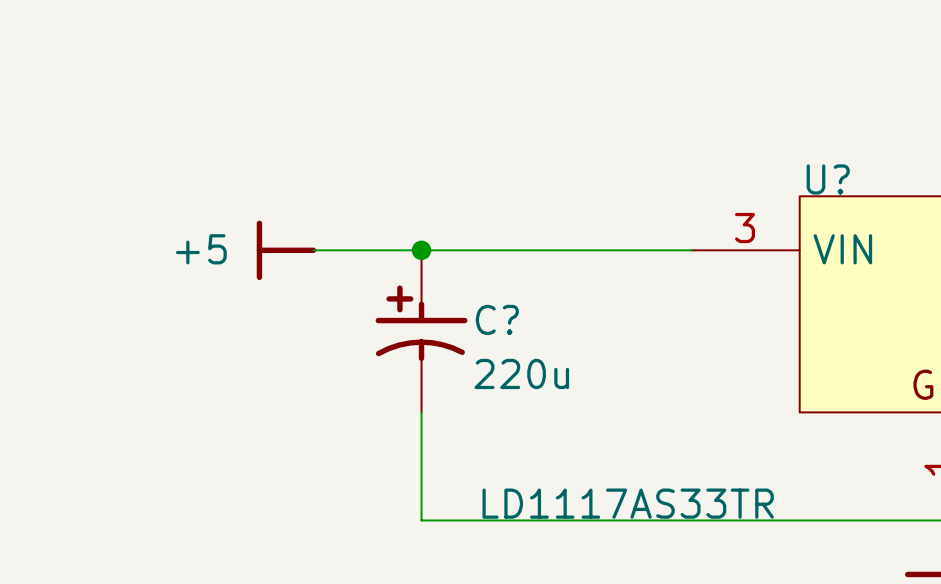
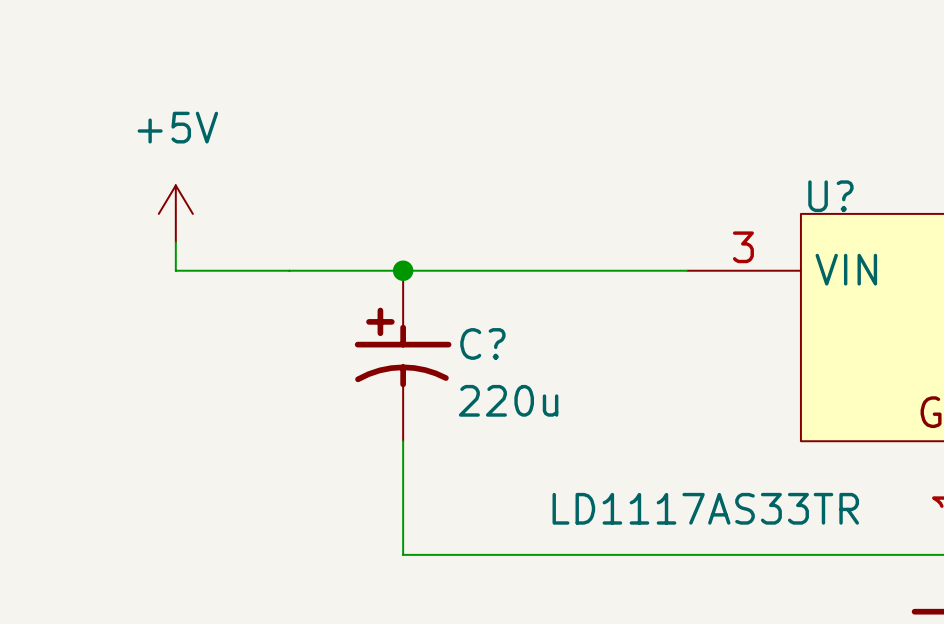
power symbol: none -> +5V (175, 213)
wire: none -> (175, 242) (175, 270) (289, 270)
power symbol: +5 (286, 250) -> none
U? value position: LD1117AS33TR (628, 503) -> LD1117AS33TR (705, 508)

